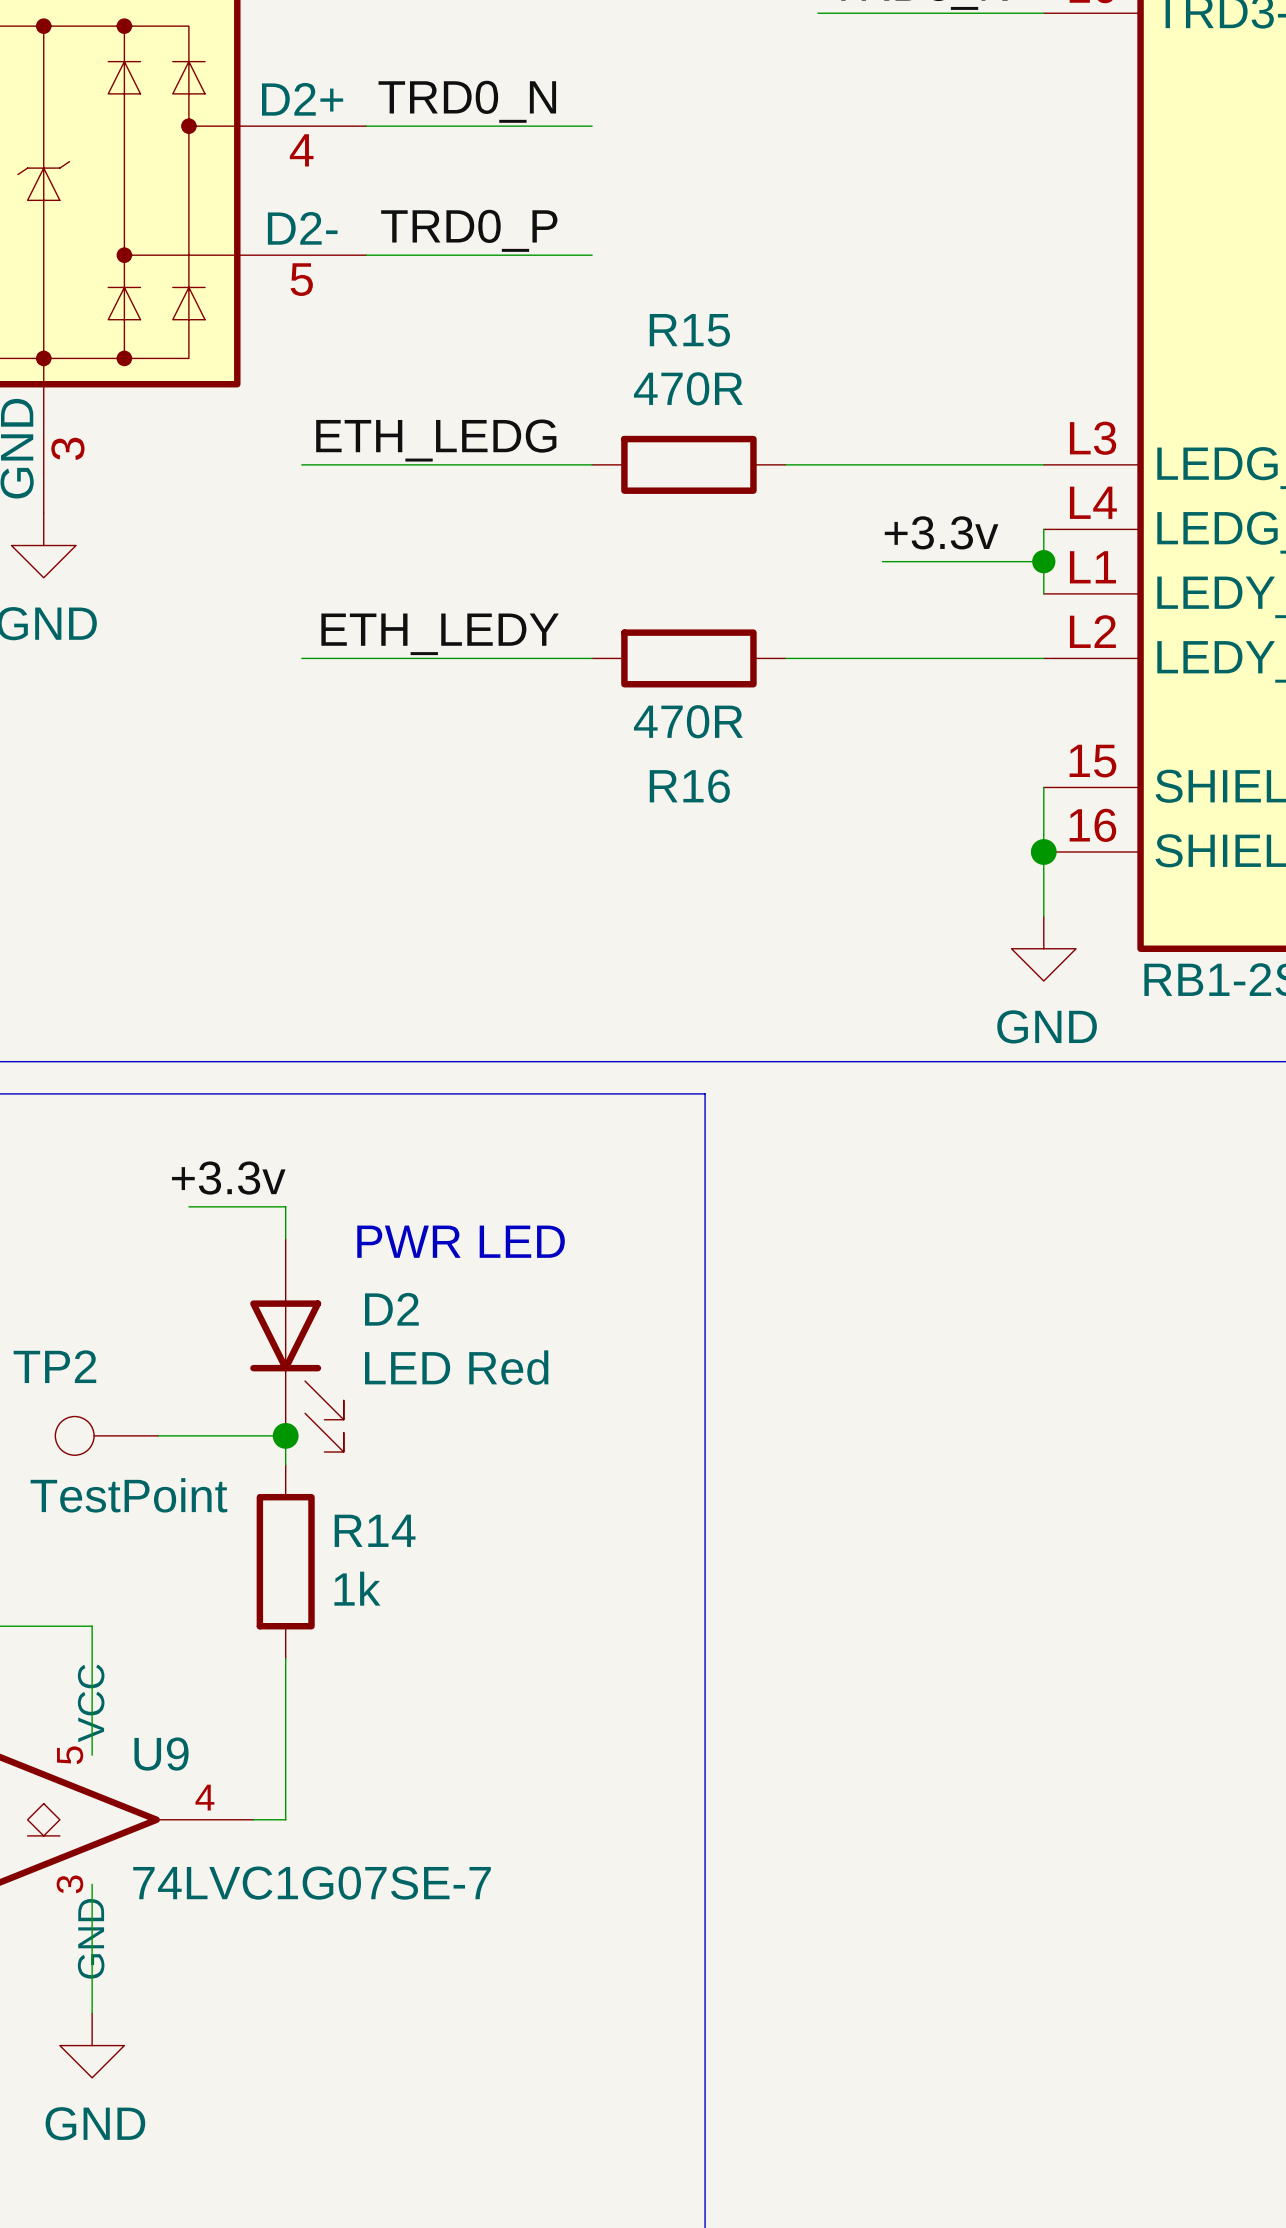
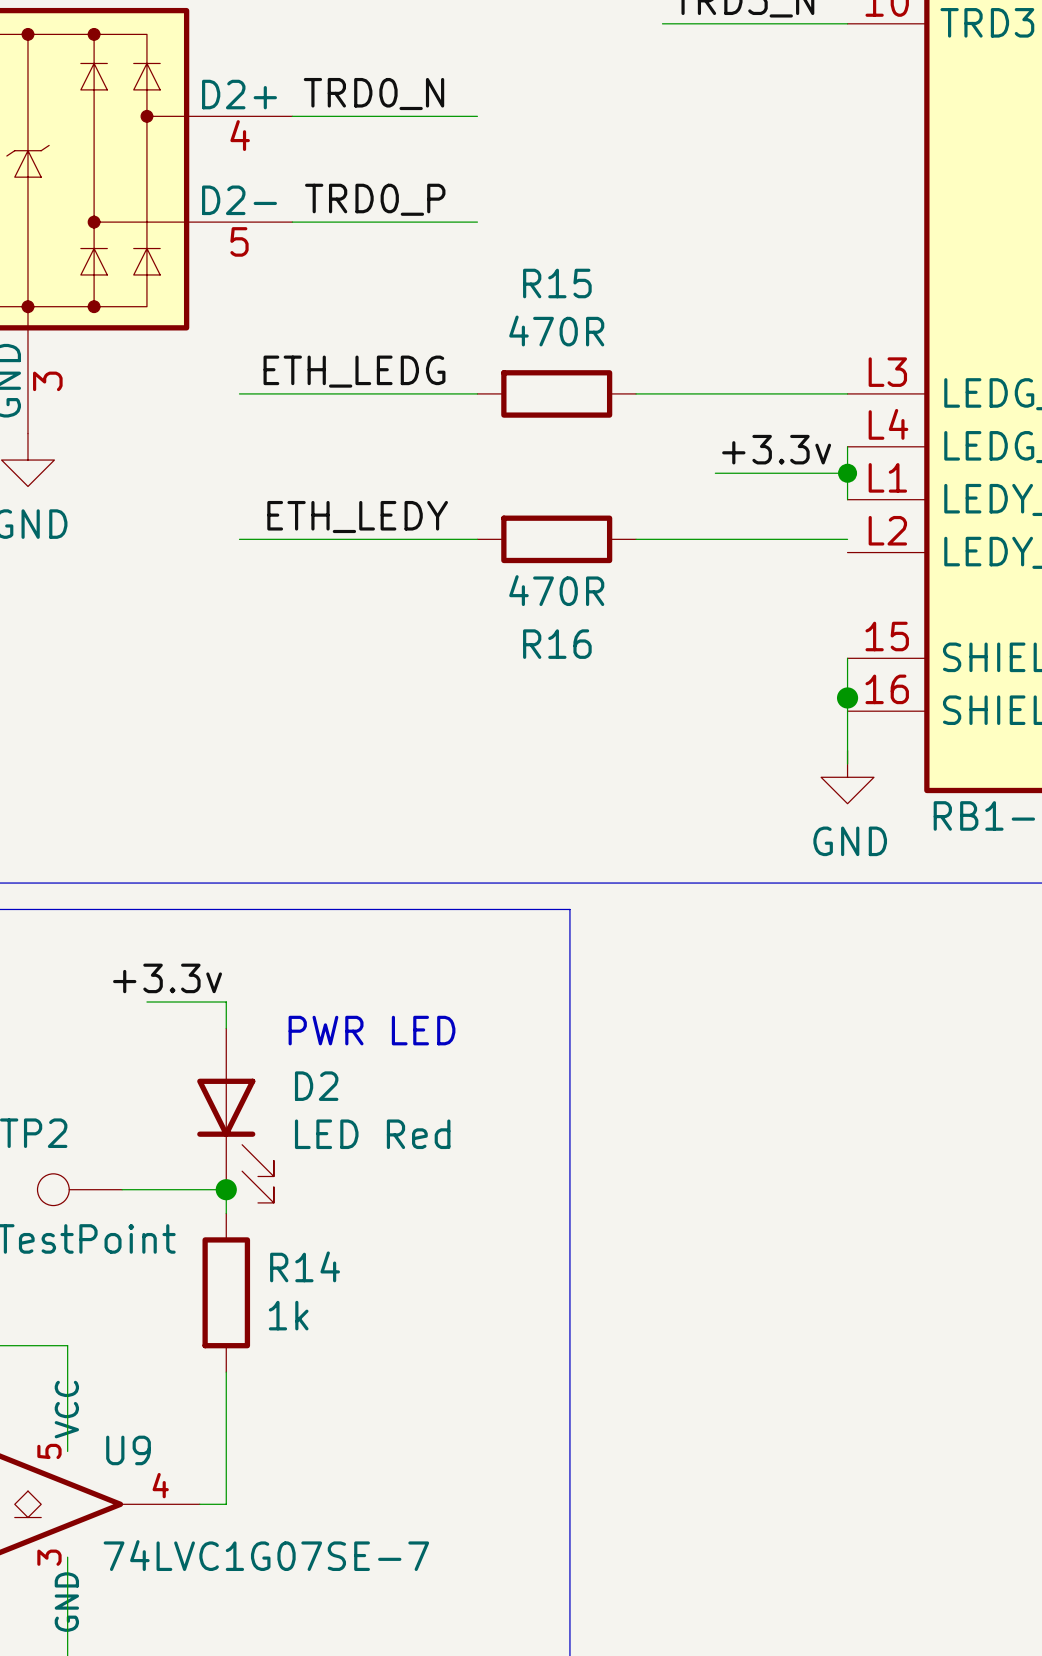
label position: ETH_LEDY (440, 634) -> ETH_LEDY (357, 517)
wire: (301, 658) (592, 658) -> (239, 539) (477, 539)
R16 position: (688, 658) -> (556, 539)
wire: (785, 658) (1043, 658) -> (636, 539) (847, 539)
junction position: (1043, 851) -> (847, 697)
power symbol position: GND (1043, 948) -> GND (847, 777)

